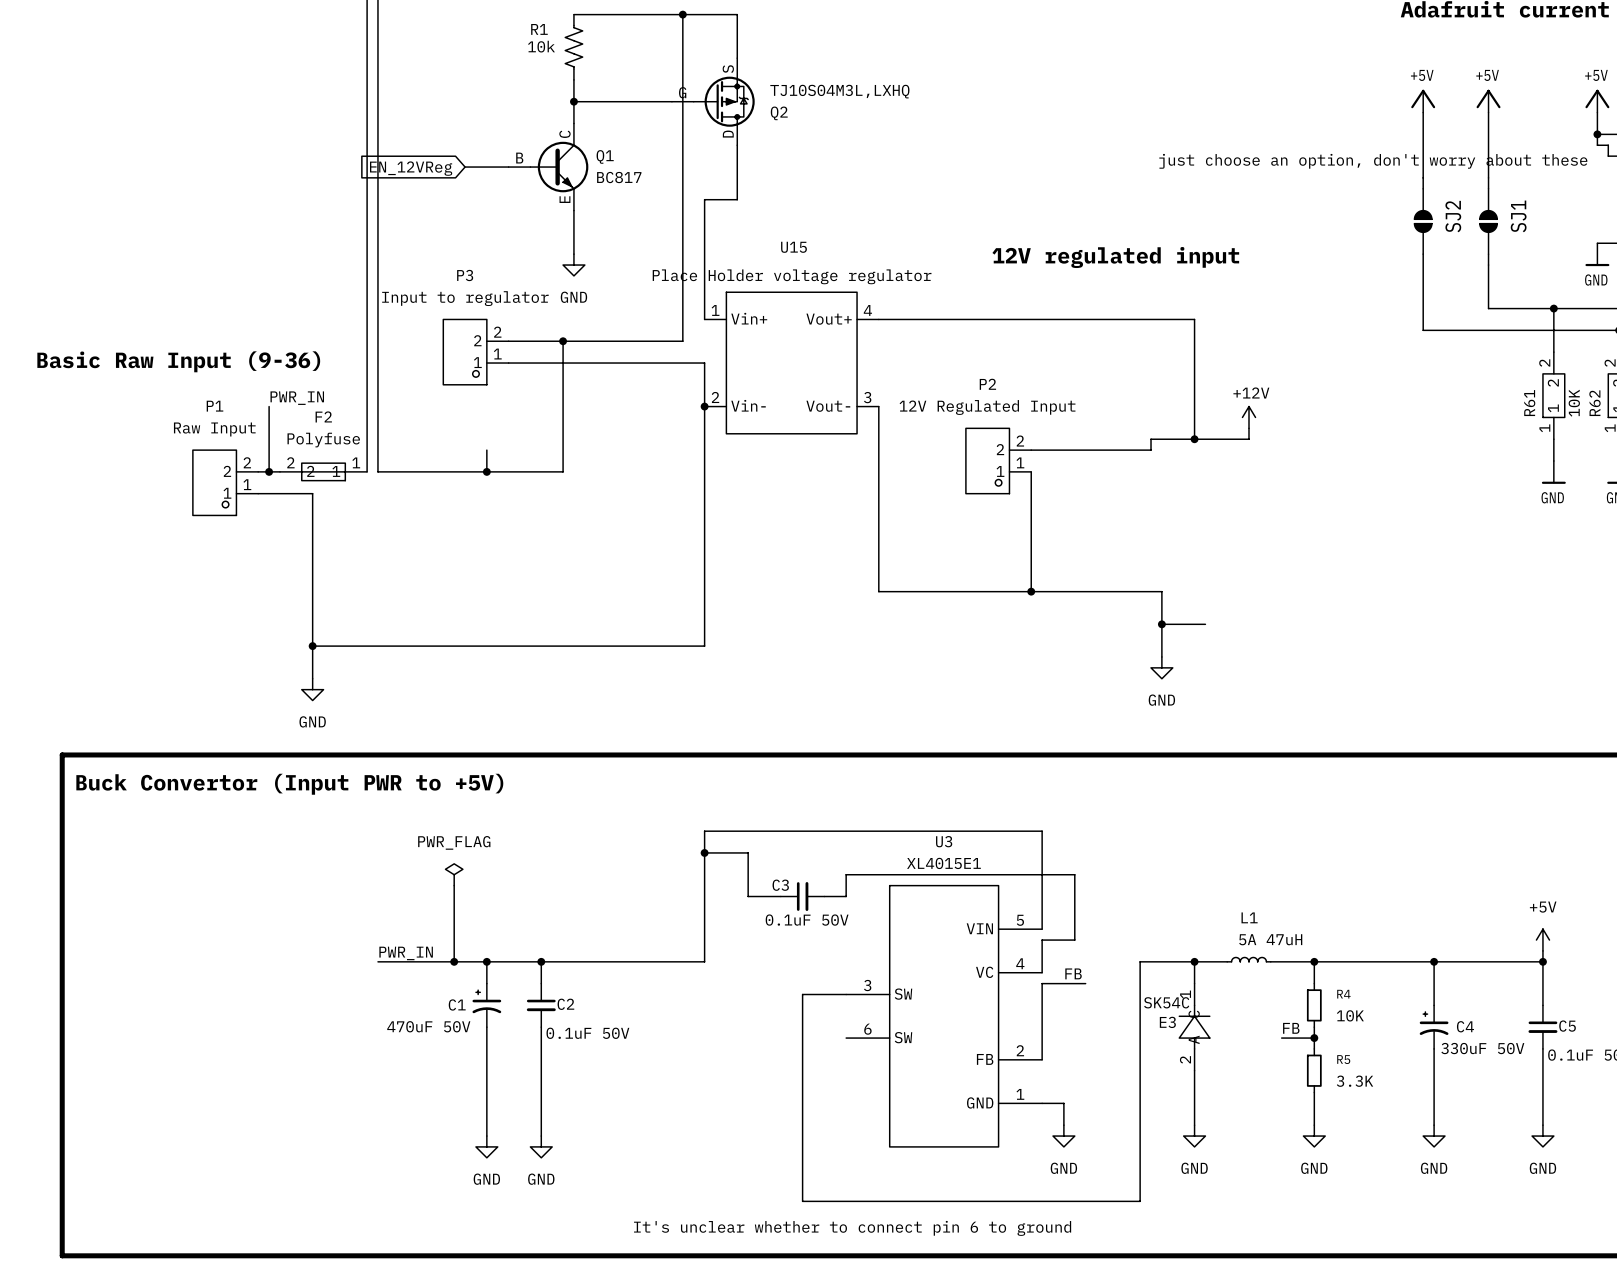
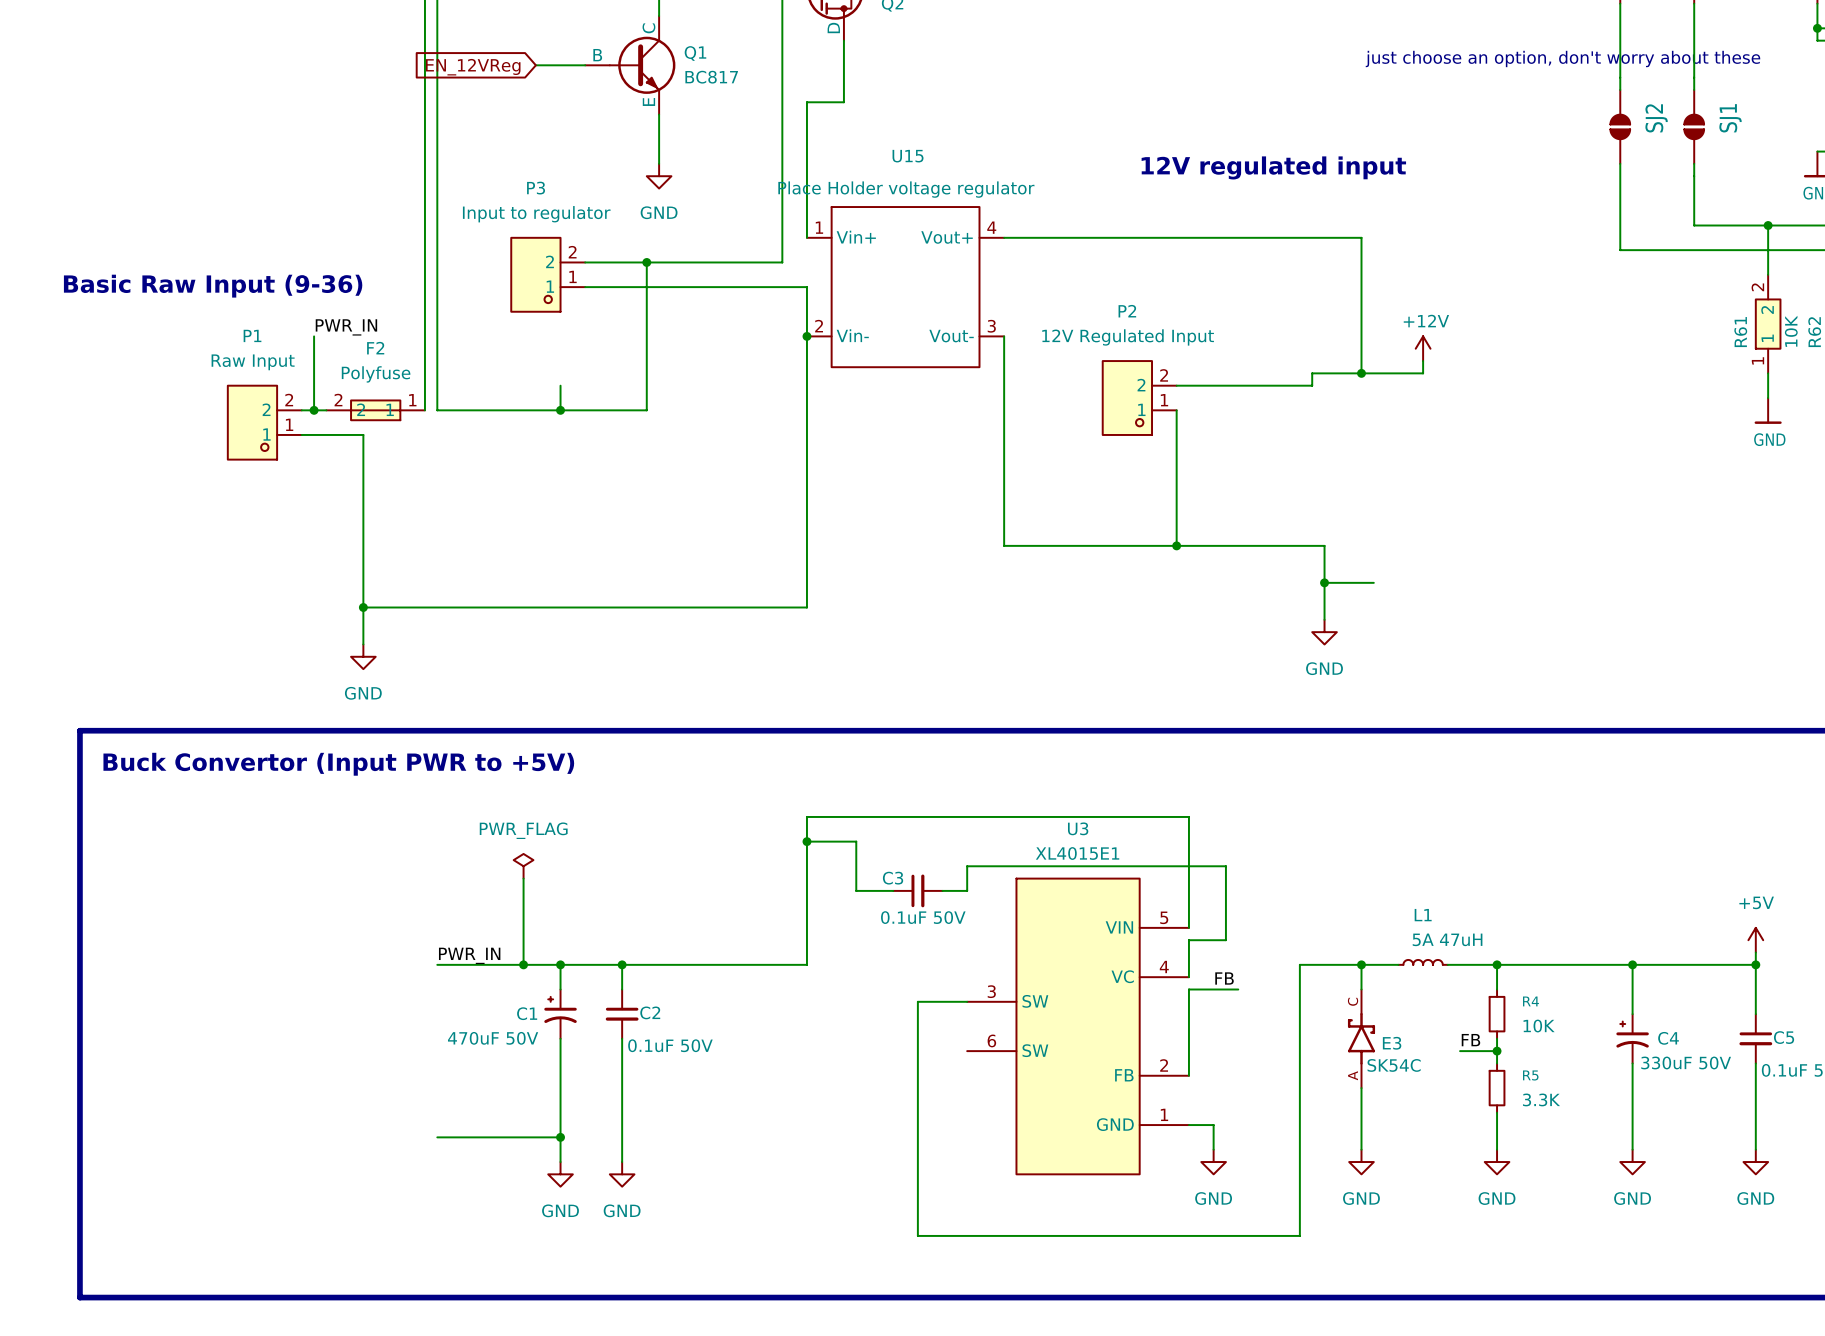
E3 symbol: [1179, 983, 1210, 1071] -> [1347, 989, 1376, 1089]
E3 value position: SK54C (1166, 1002) -> SK54C (1394, 1065)
E3 name position: E3 (1167, 1022) -> E3 (1392, 1043)
wire: none -> (437, 1137) (560, 1137)
junction: none -> (560, 1137)
text: It's unclear whether to connect pin 6 to ground (852, 1228) -> none

